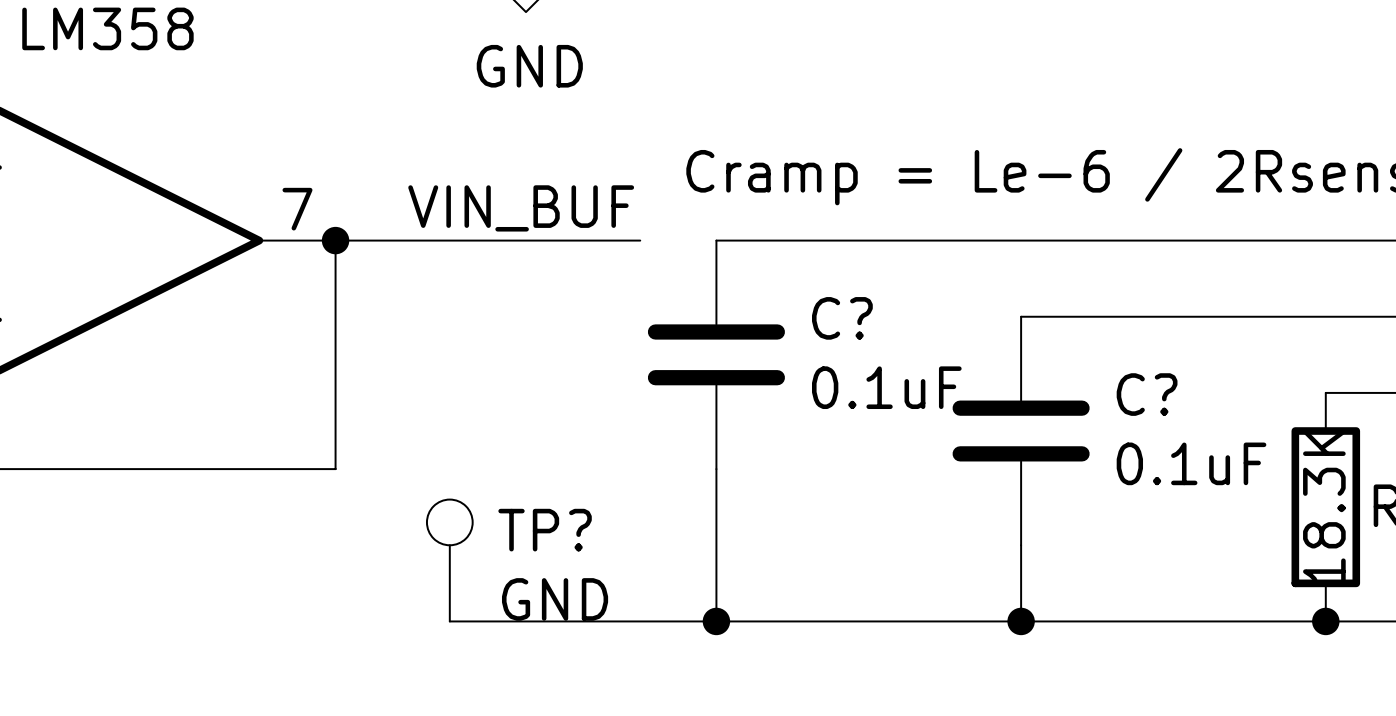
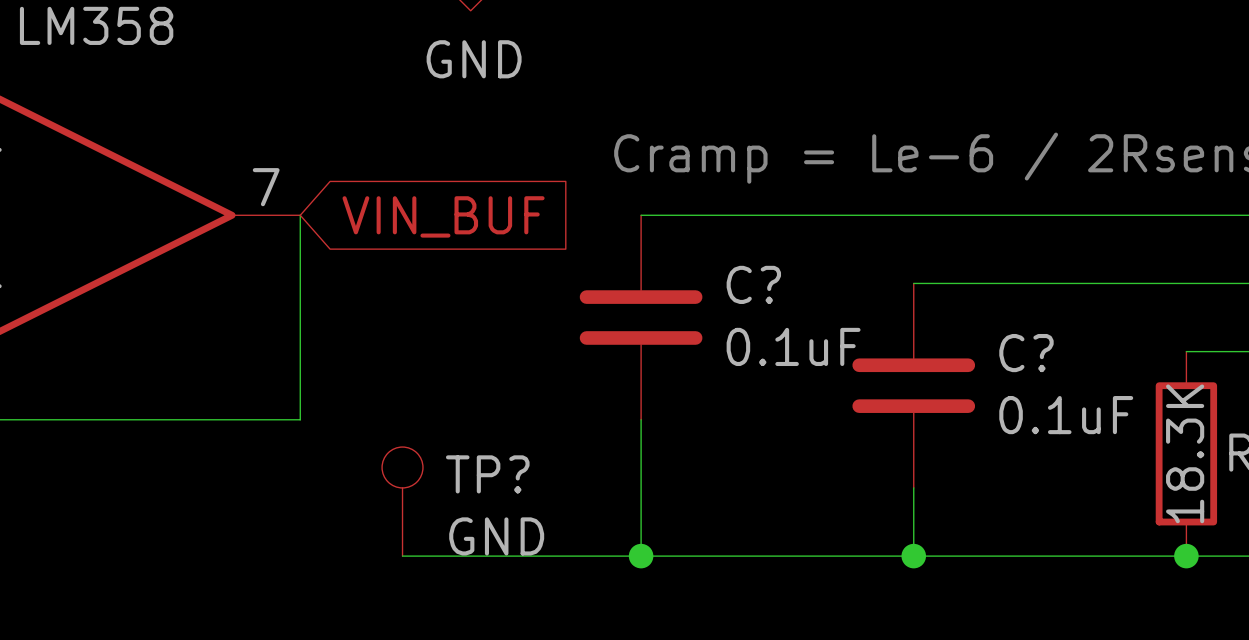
label: VIN_BUF (521, 208) -> none
wire: (335, 240) (640, 240) -> none
junction: (335, 240) -> none
global label: none -> VIN_BUF (443, 216)

